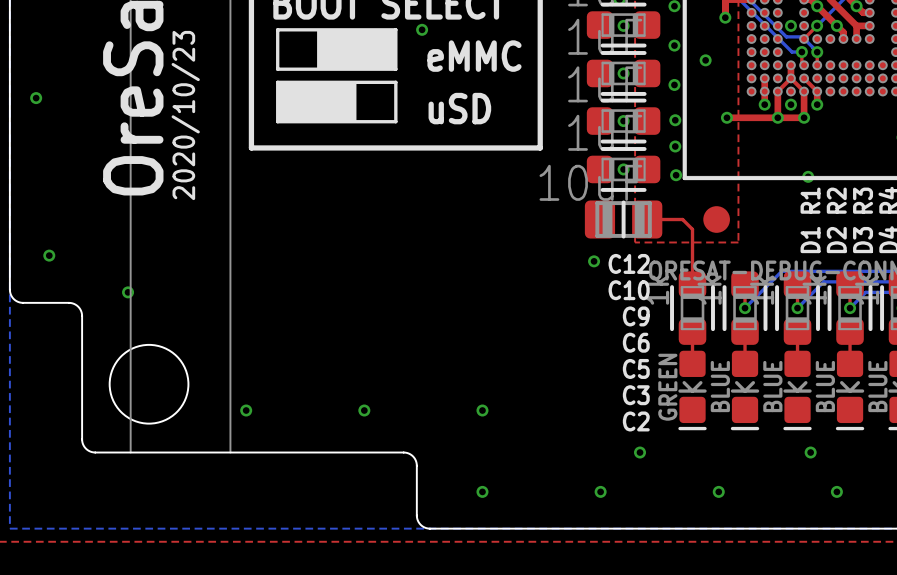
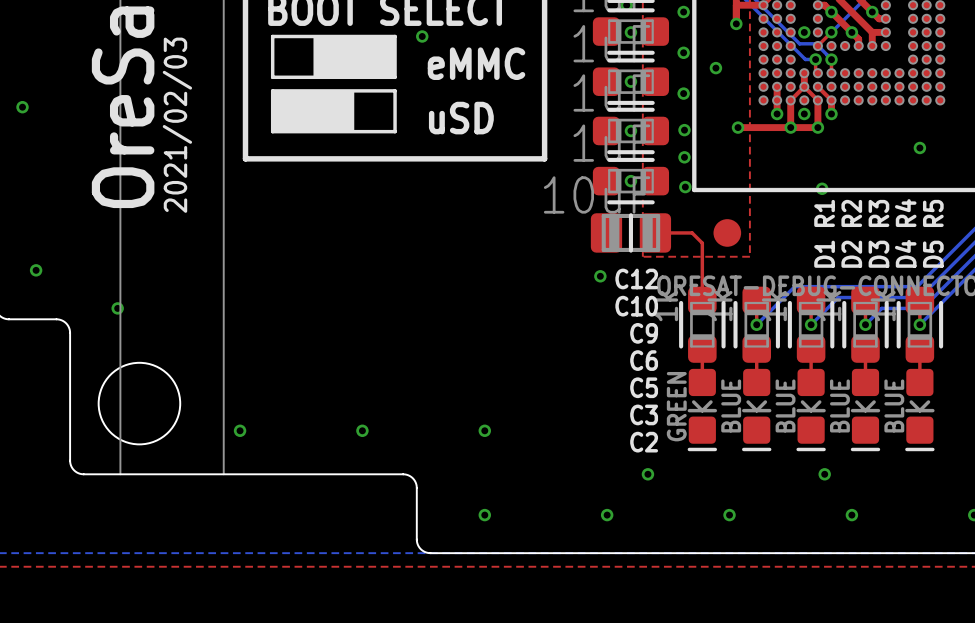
text: 2020/10/23 (185, 115) -> 2021/02/03 (177, 125)

